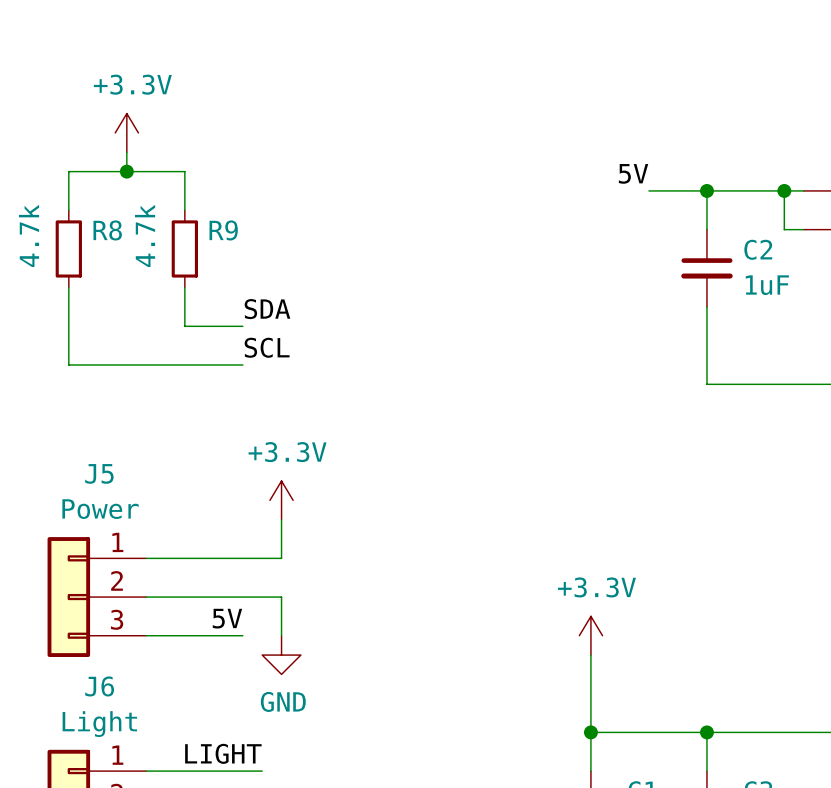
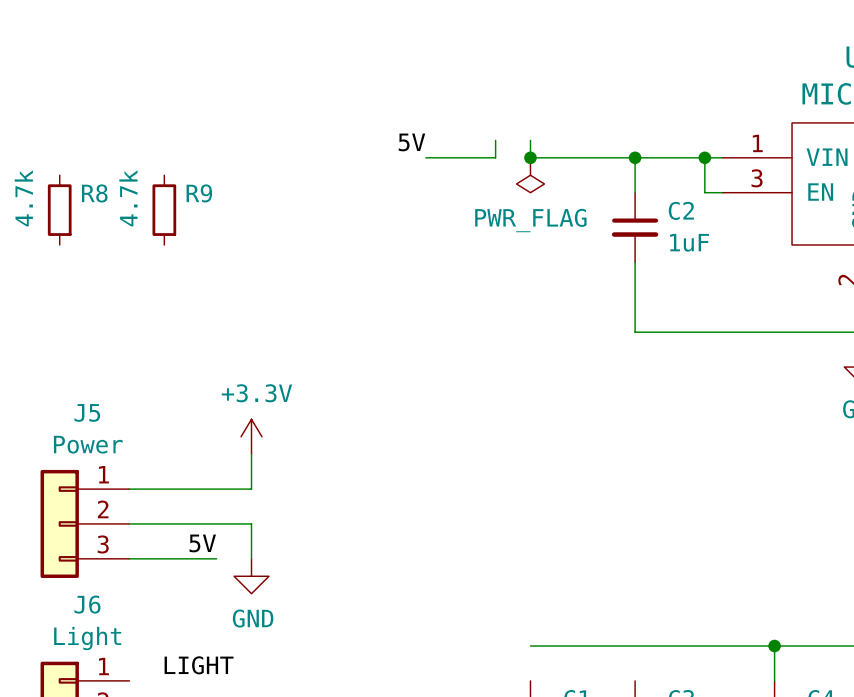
power symbol: +3.3V (126, 132) -> none
wire: (126, 152) (126, 171) -> none
junction: (126, 171) -> none
wire: none -> (495, 140) (495, 157) (425, 157)
wire: none -> (530, 140) (530, 157) (582, 157)
label position: 5V (633, 173) -> 5V (411, 142)
junction: none -> (530, 157)
wire: (68, 210) (68, 171) (184, 171) (184, 210) -> none
power symbol: none -> PWR_FLAG (530, 175)
wire: (68, 287) (68, 364) (242, 364) -> none
wire: (184, 287) (184, 326) (242, 326) -> none
label: SDA (267, 309) -> none
label: SCL (267, 347) -> none
power symbol: +3.3V (590, 635) -> none
wire: (590, 655) (590, 771) -> none
junction: (590, 732) -> none
wire: (706, 732) (706, 771) -> none
junction: (706, 732) -> none
wire: (146, 771) (262, 771) -> none

